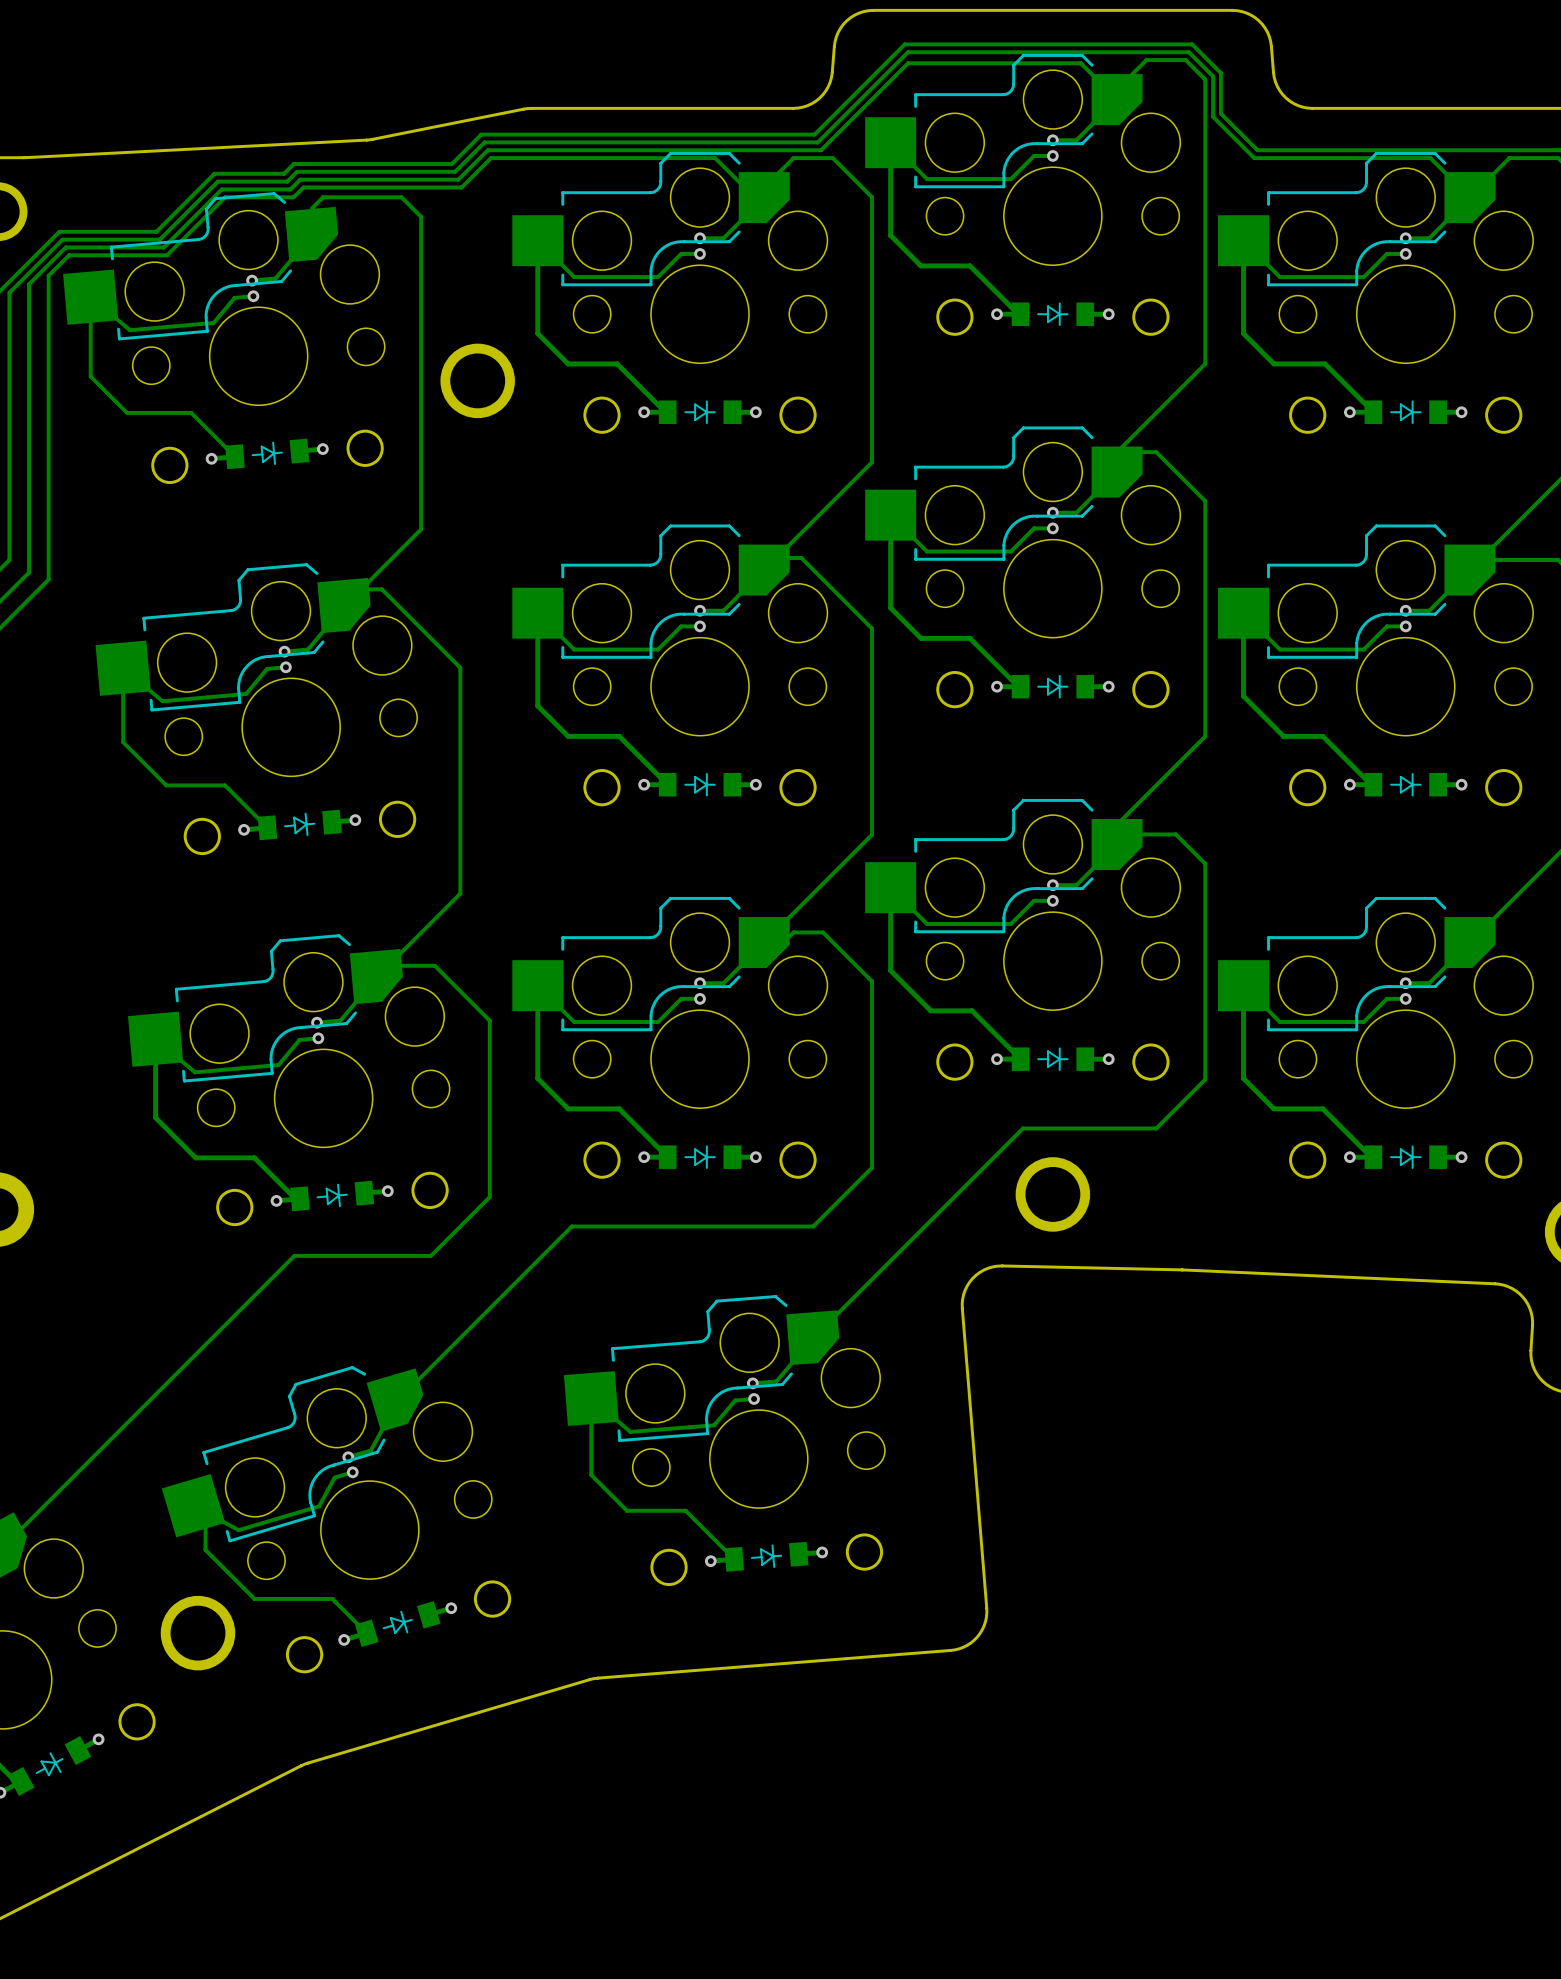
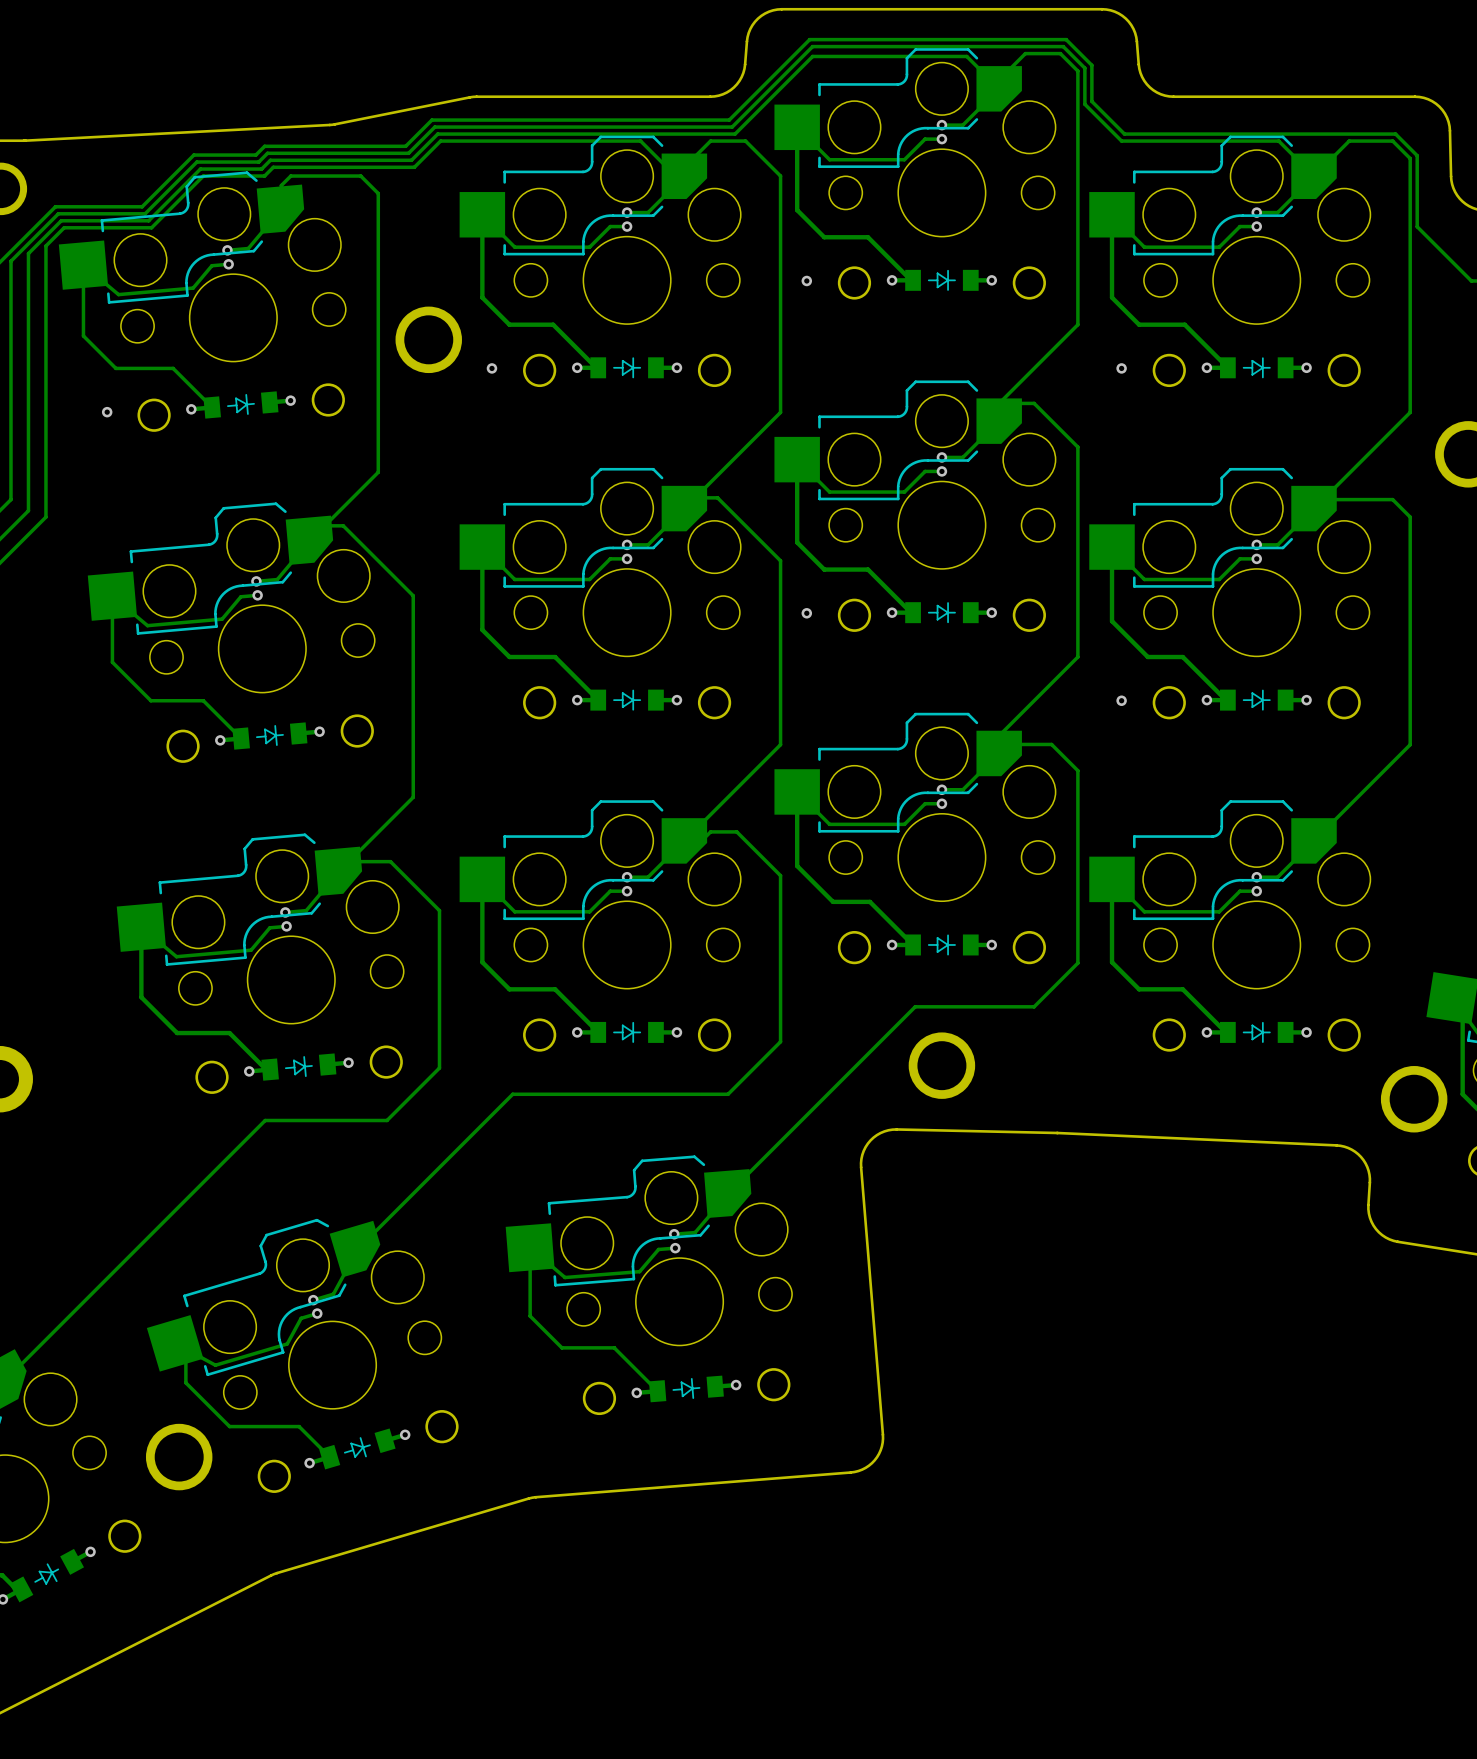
via: none -> (806, 280)
via: none -> (491, 368)
via: none -> (1121, 368)
via: none -> (107, 412)
via: none -> (806, 613)
via: none -> (1121, 700)

